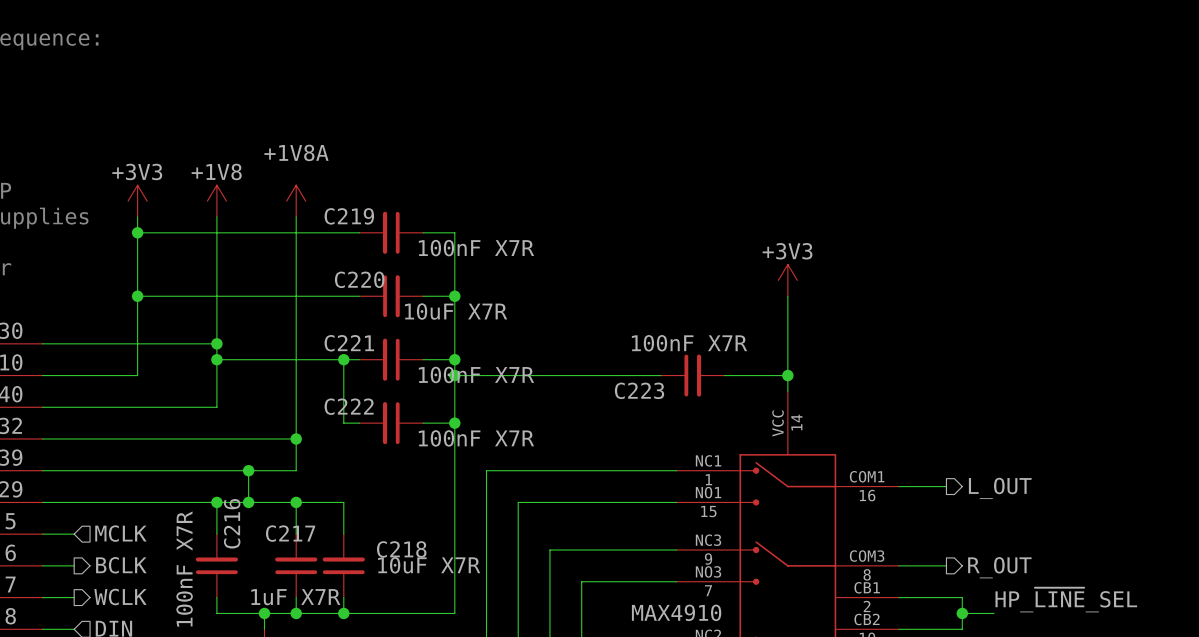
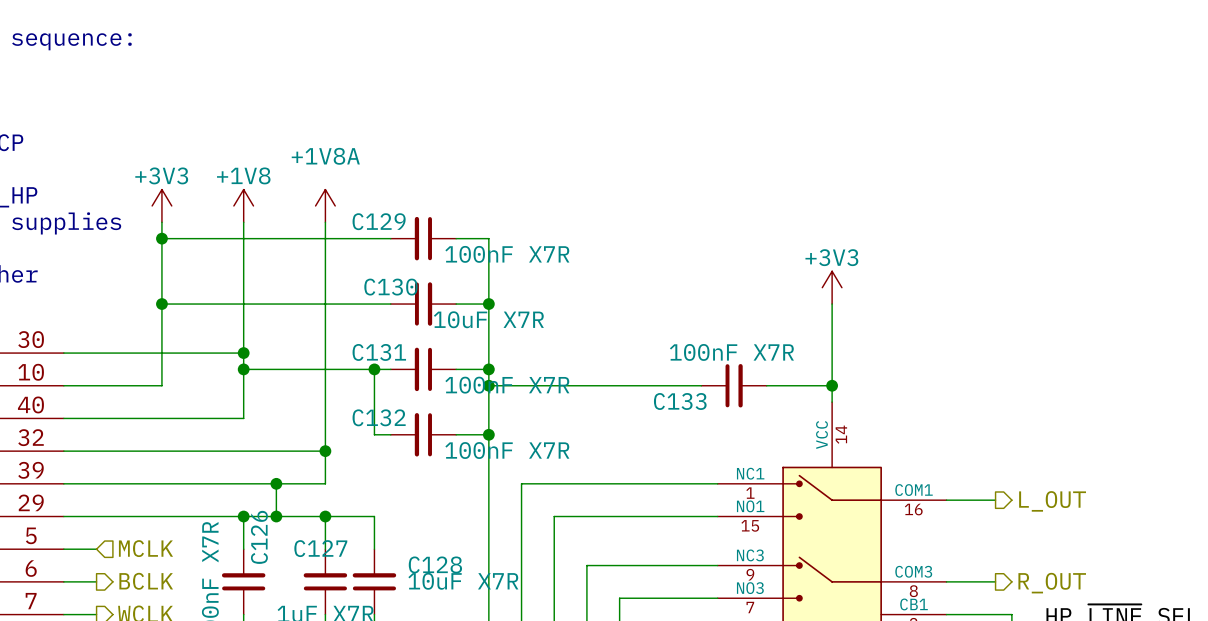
C219 name: C219 (349, 216) -> C129 (379, 221)
C220 name: C220 (359, 279) -> C130 (390, 287)
C221 name: C221 (349, 343) -> C131 (379, 352)
C223 name: C223 (639, 390) -> C133 (680, 401)
C222 name: C222 (349, 406) -> C132 (379, 417)
C216 name: C216 (232, 523) -> C126 (259, 537)
C217 name: C217 (290, 533) -> C127 (320, 548)
C218 name: C218 (401, 549) -> C128 (435, 564)

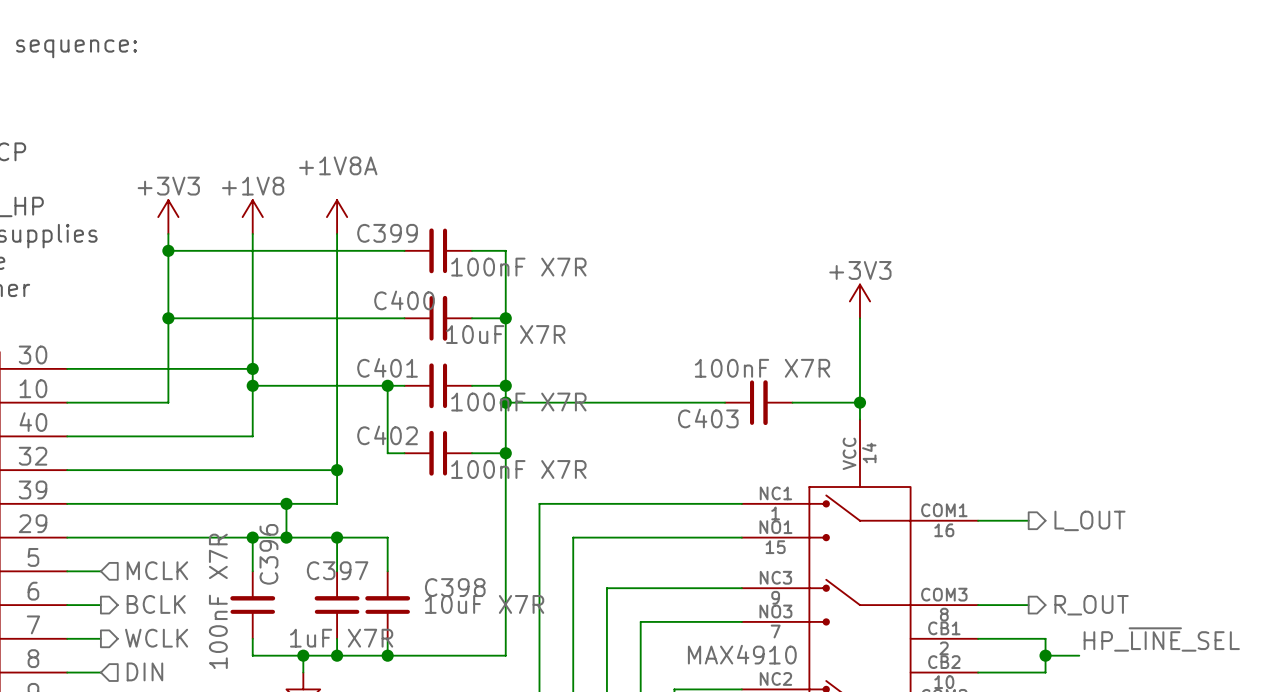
C129 name: C129 (379, 221) -> C399 (387, 233)
C130 name: C130 (390, 287) -> C400 (404, 300)
C131 name: C131 (379, 352) -> C401 (387, 367)
C133 name: C133 (680, 401) -> C403 (708, 418)
C132 name: C132 (379, 417) -> C402 (387, 435)
C126 name: C126 (259, 537) -> C396 (268, 554)
C127 name: C127 (320, 548) -> C397 (337, 570)
C128 name: C128 (435, 564) -> C398 (455, 587)

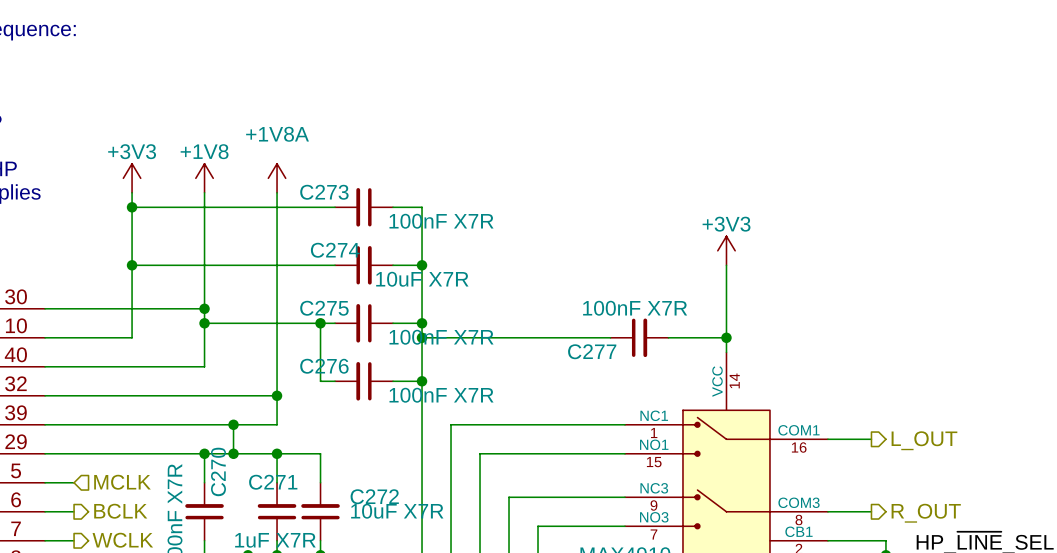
C399 name: C399 (387, 233) -> C273 (324, 192)
C400 name: C400 (404, 300) -> C274 (335, 250)
C401 name: C401 (387, 367) -> C275 (324, 308)
C403 name: C403 (708, 418) -> C277 (592, 351)
C402 name: C402 (387, 435) -> C276 (324, 366)
C396 name: C396 (268, 554) -> C270 (218, 471)
C397 name: C397 (337, 570) -> C271 (273, 482)
C398 name: C398 (455, 587) -> C272 (374, 496)

